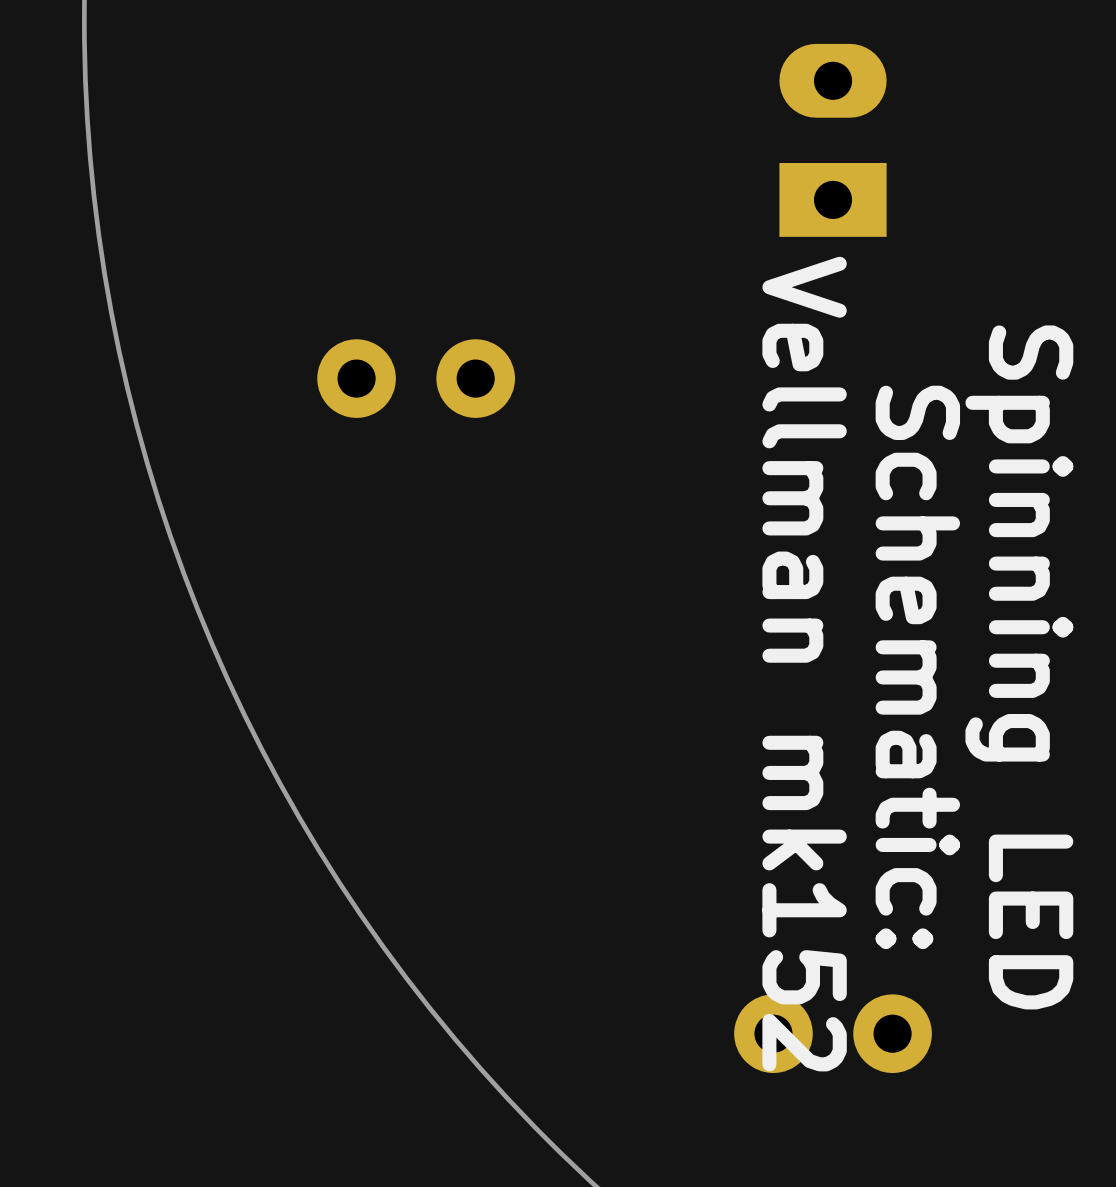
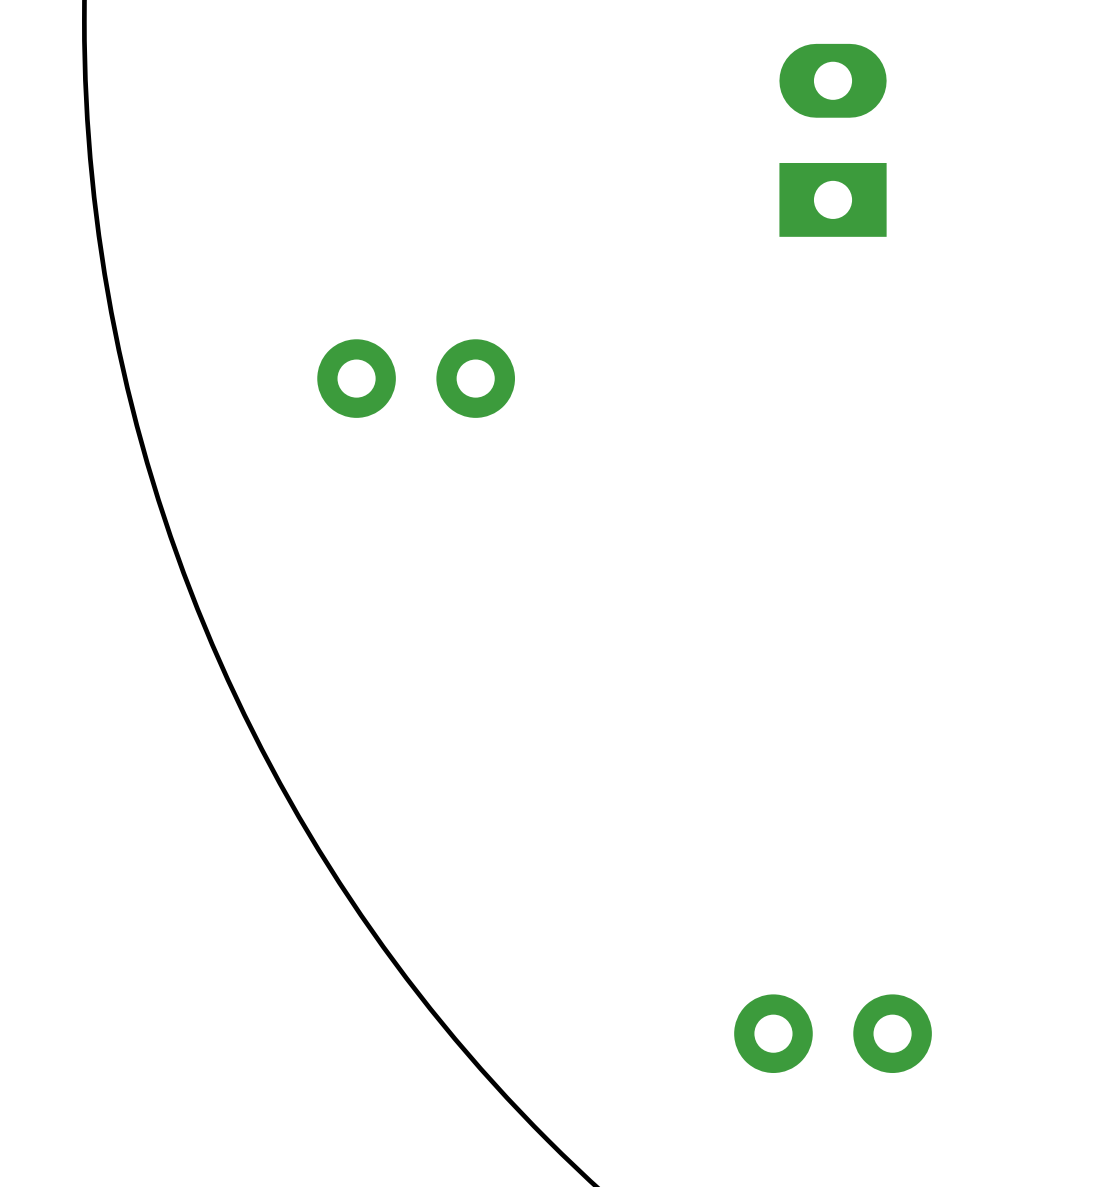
text: Vellman mk152 (804, 664) -> none
text: Schematic: (917, 667) -> none
text: Spinning LED (1019, 667) -> none

